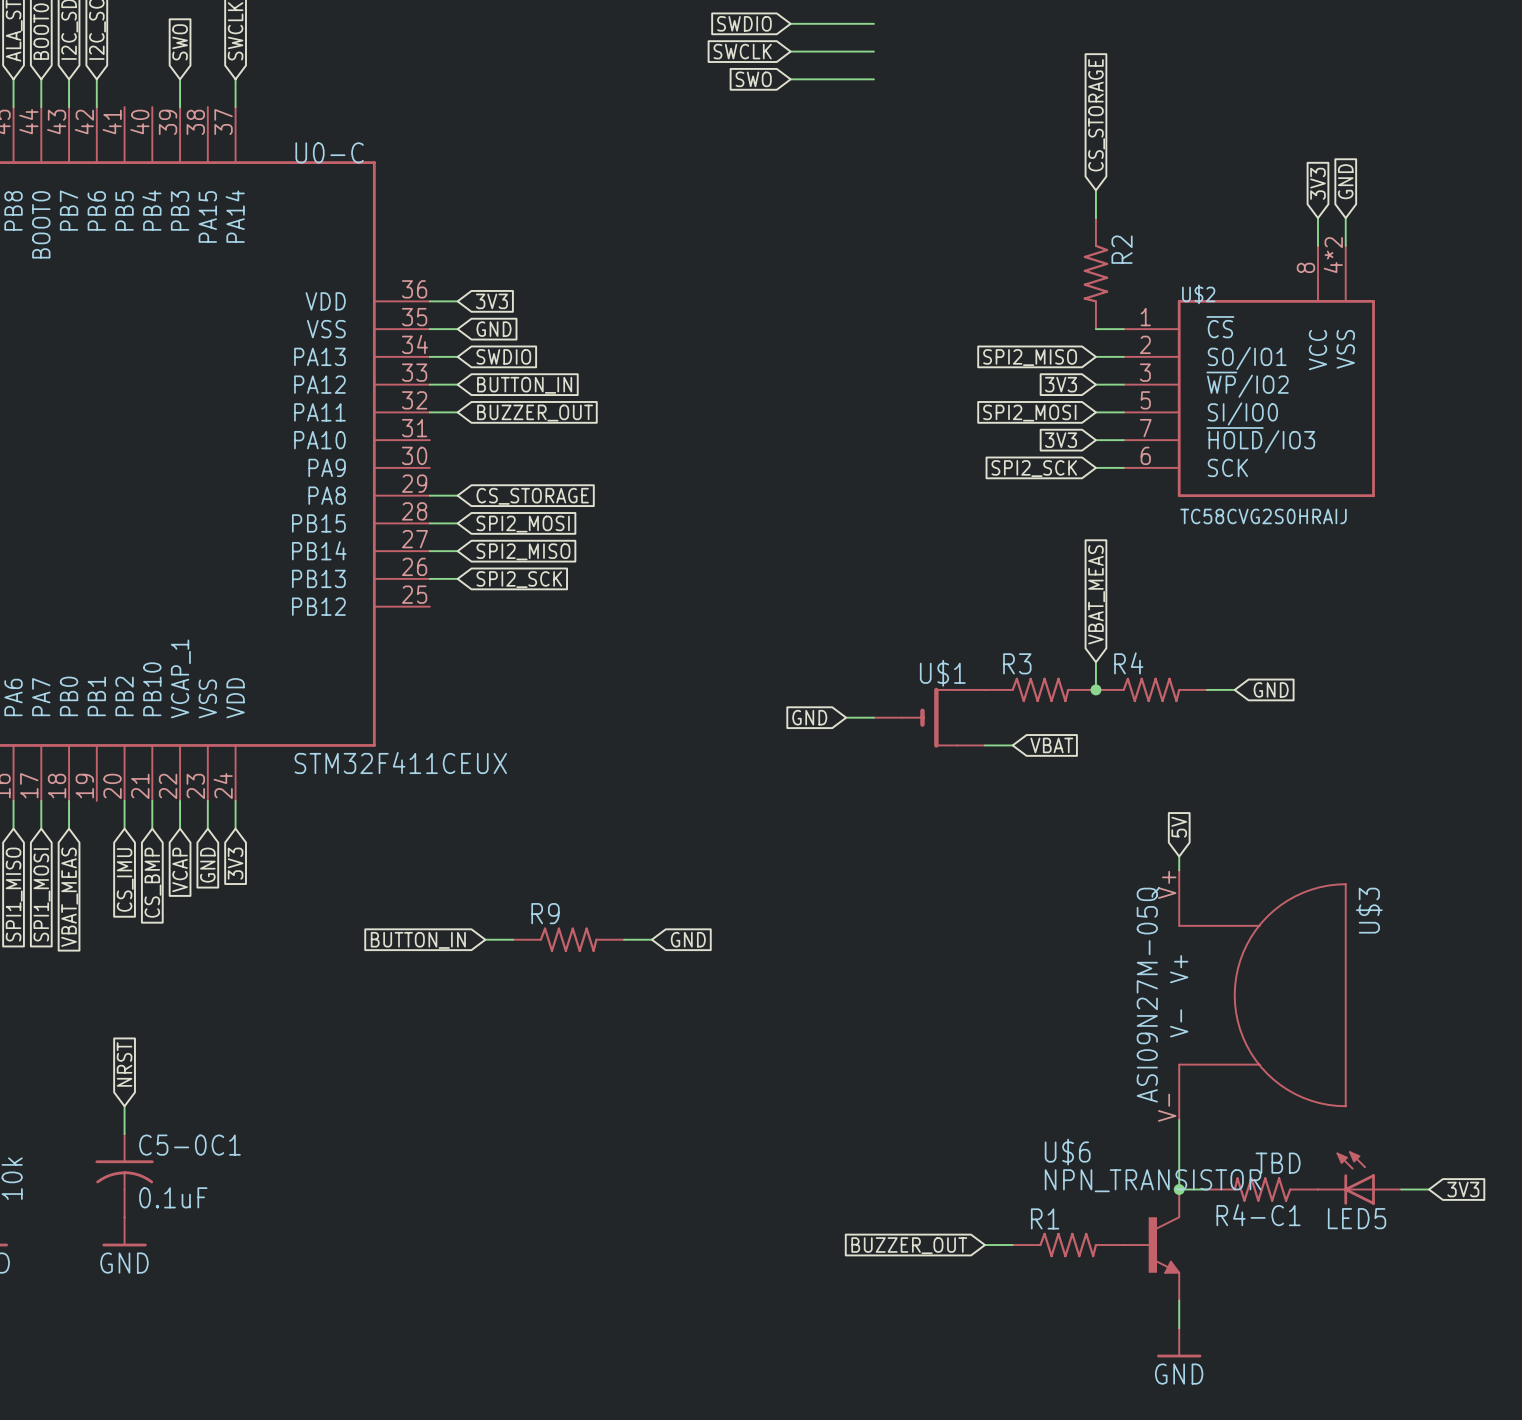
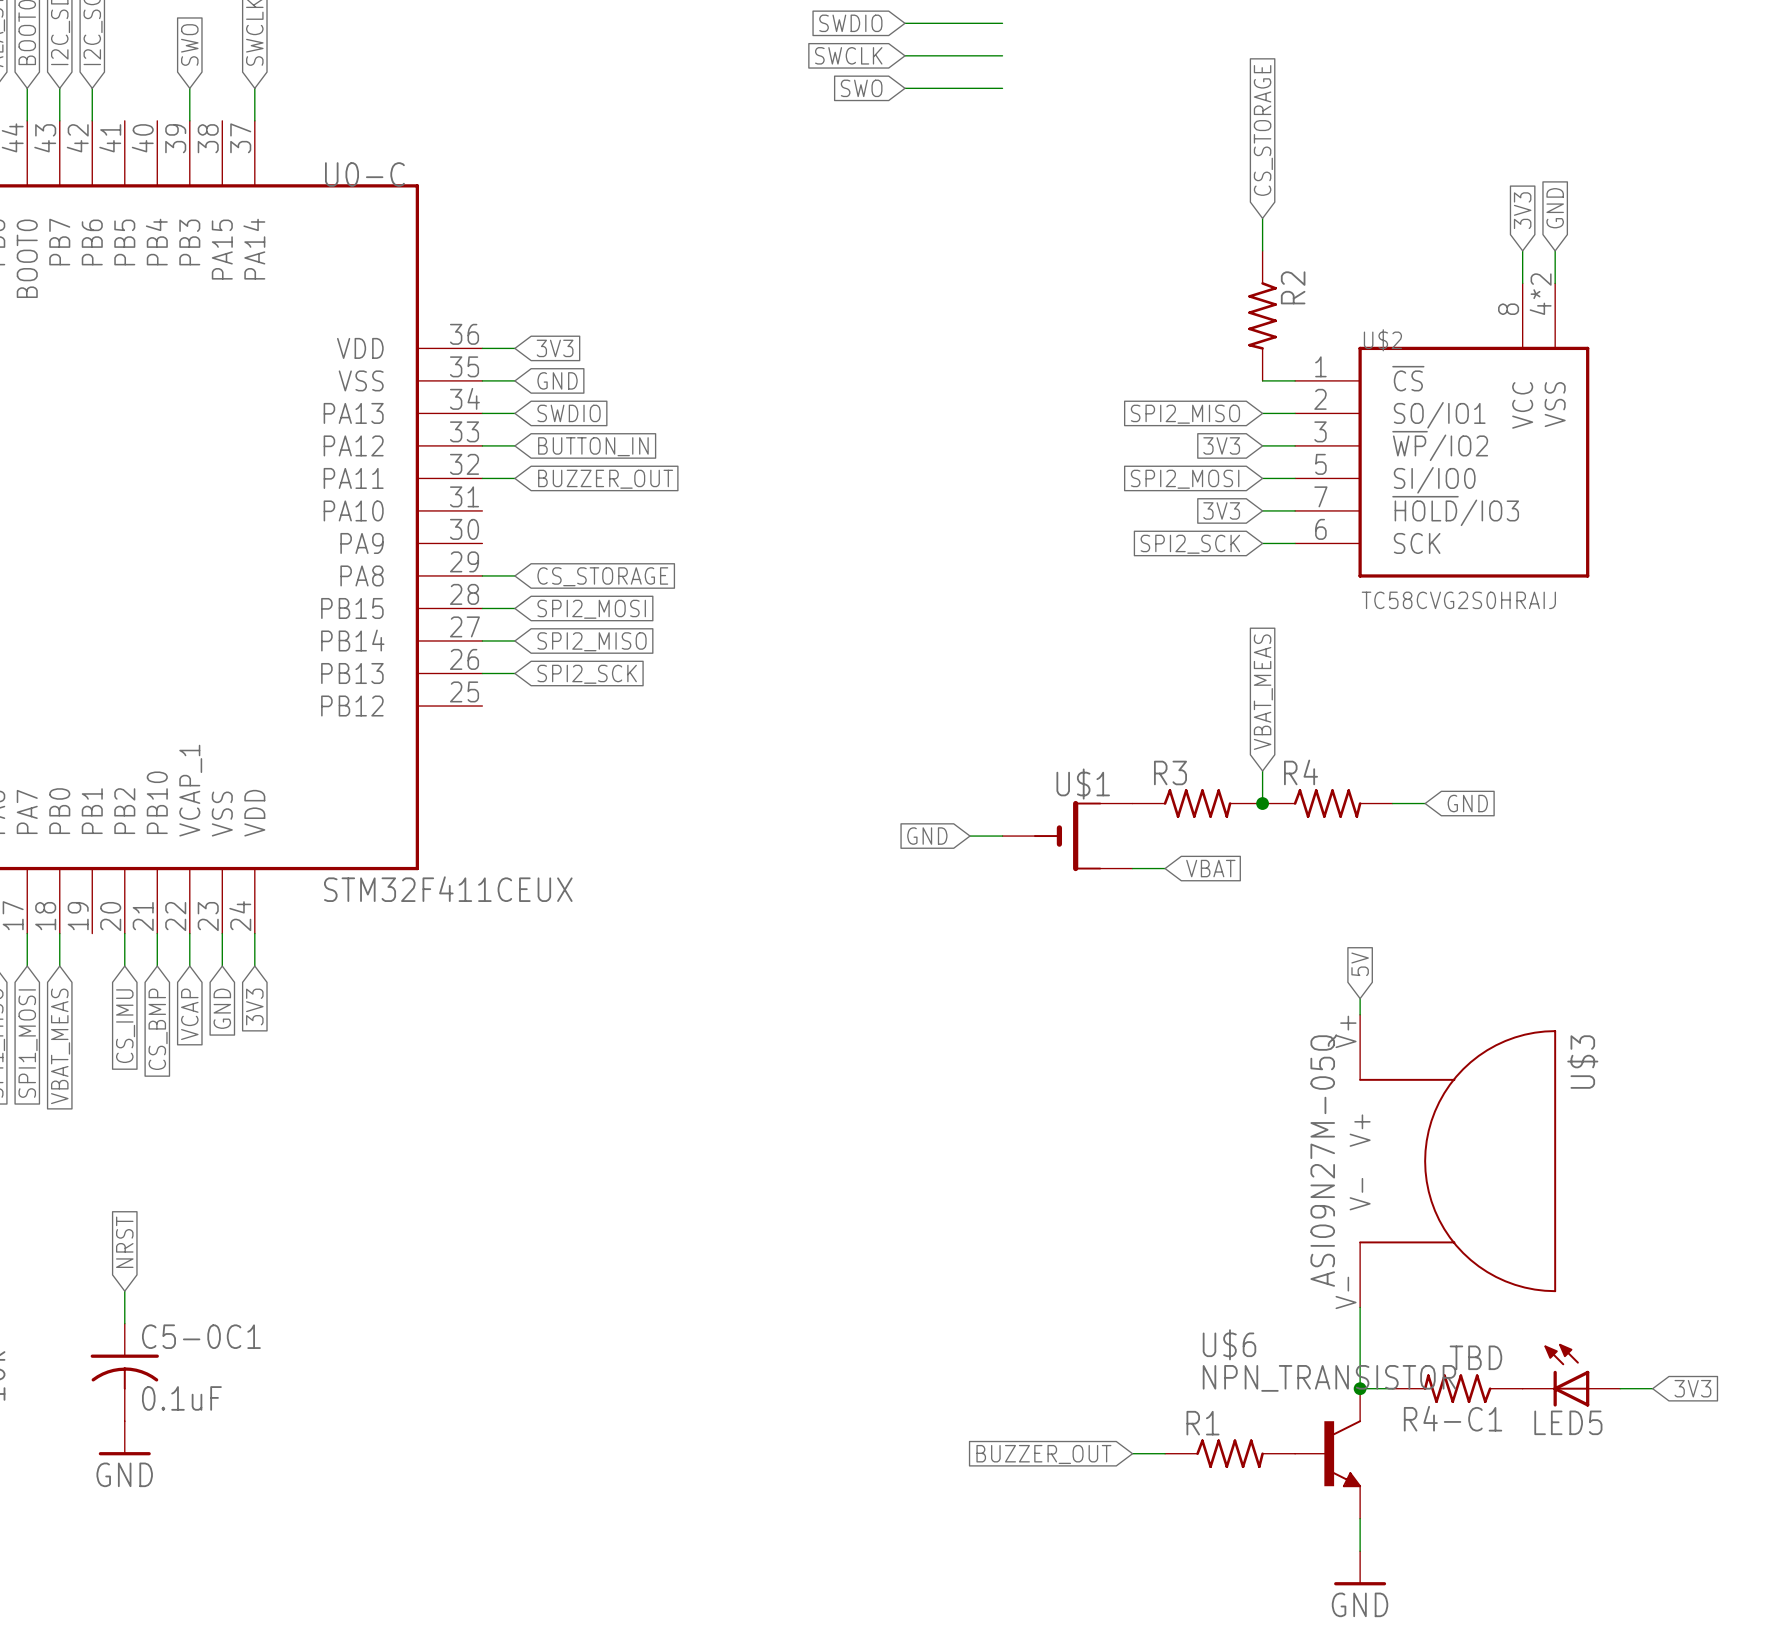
wire: (485, 939) (513, 939) -> none
R9: (568, 939) -> none
wire: (624, 939) (651, 939) -> none
global label: GND (688, 939) -> none
global label: BUTTON_IN (418, 940) -> none

